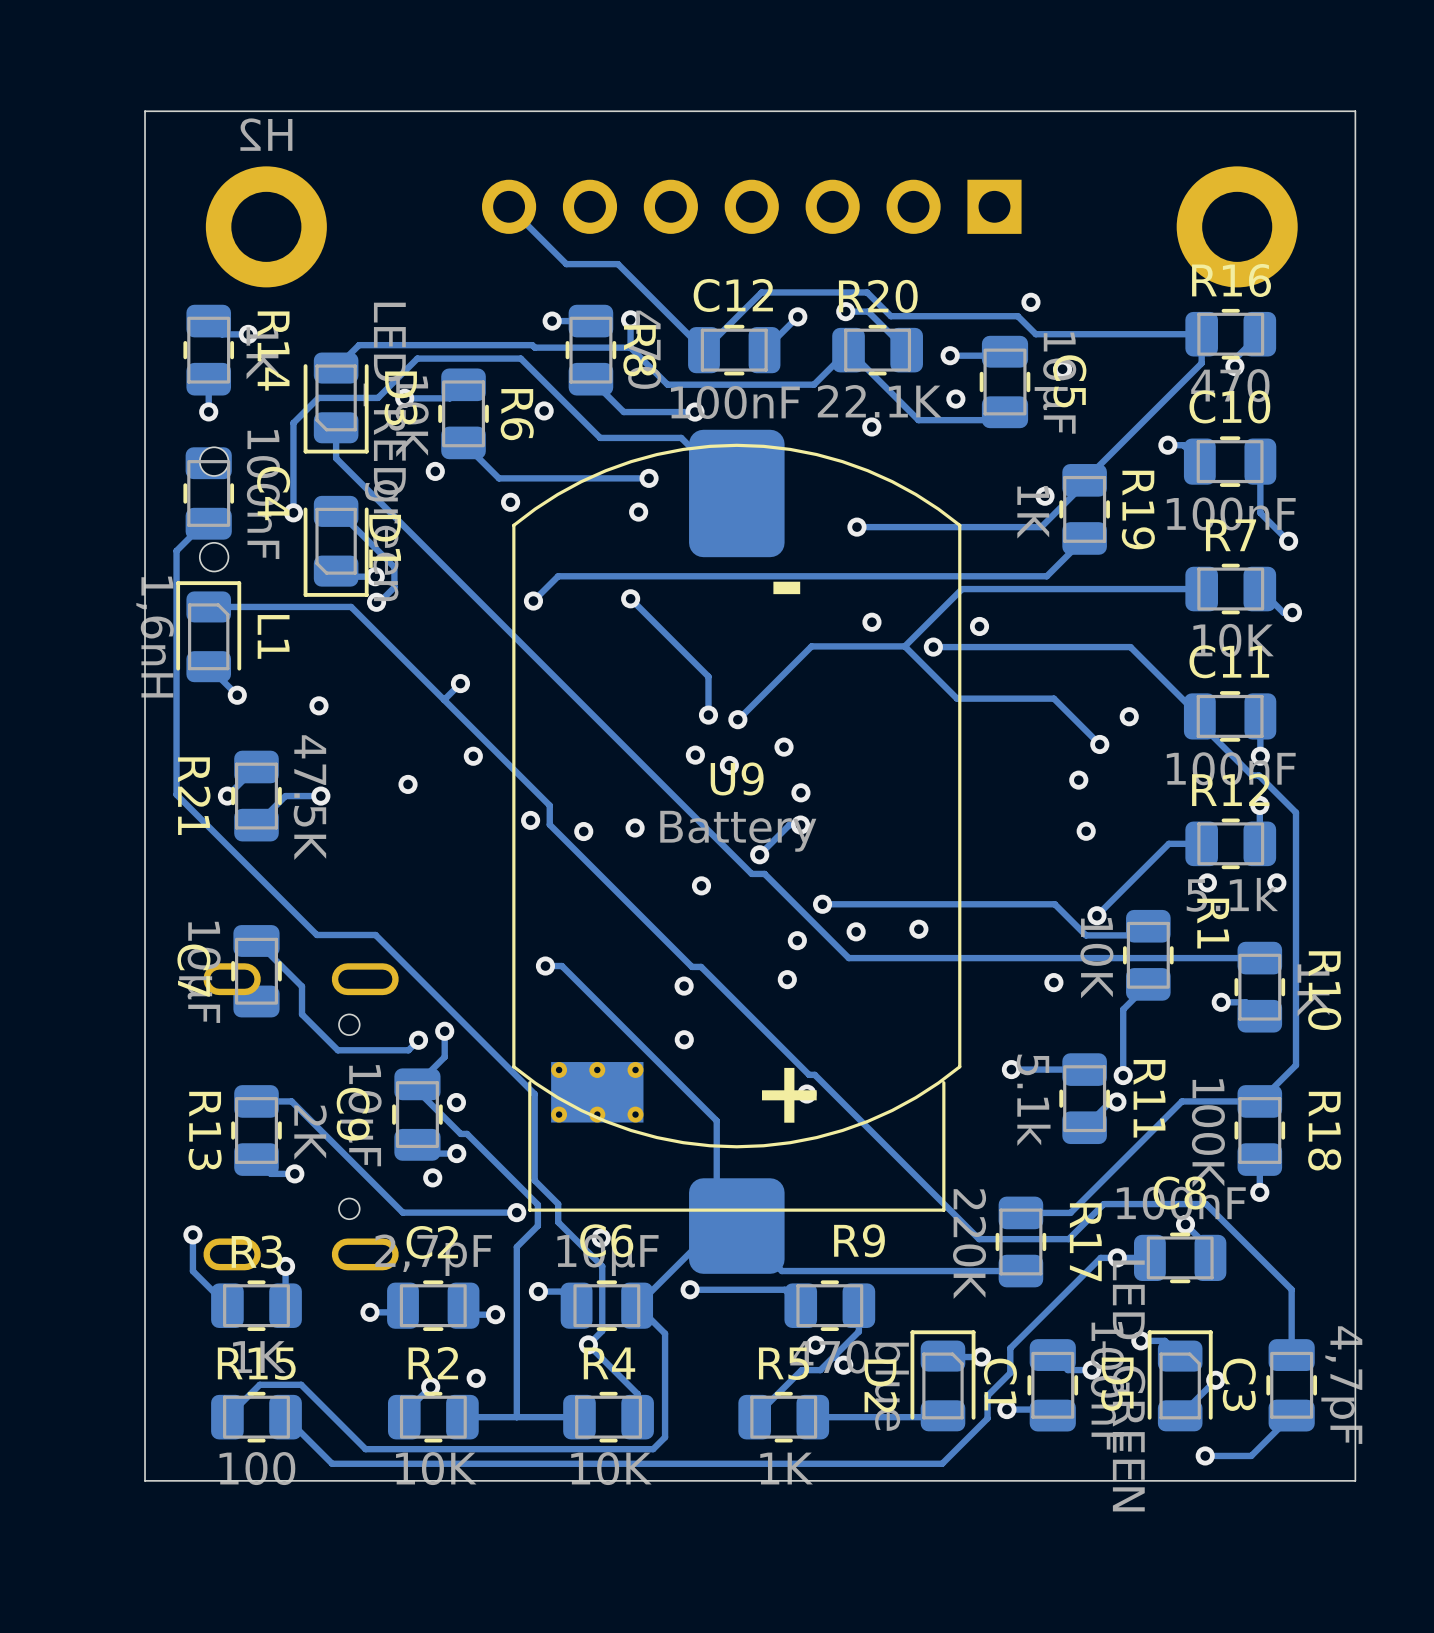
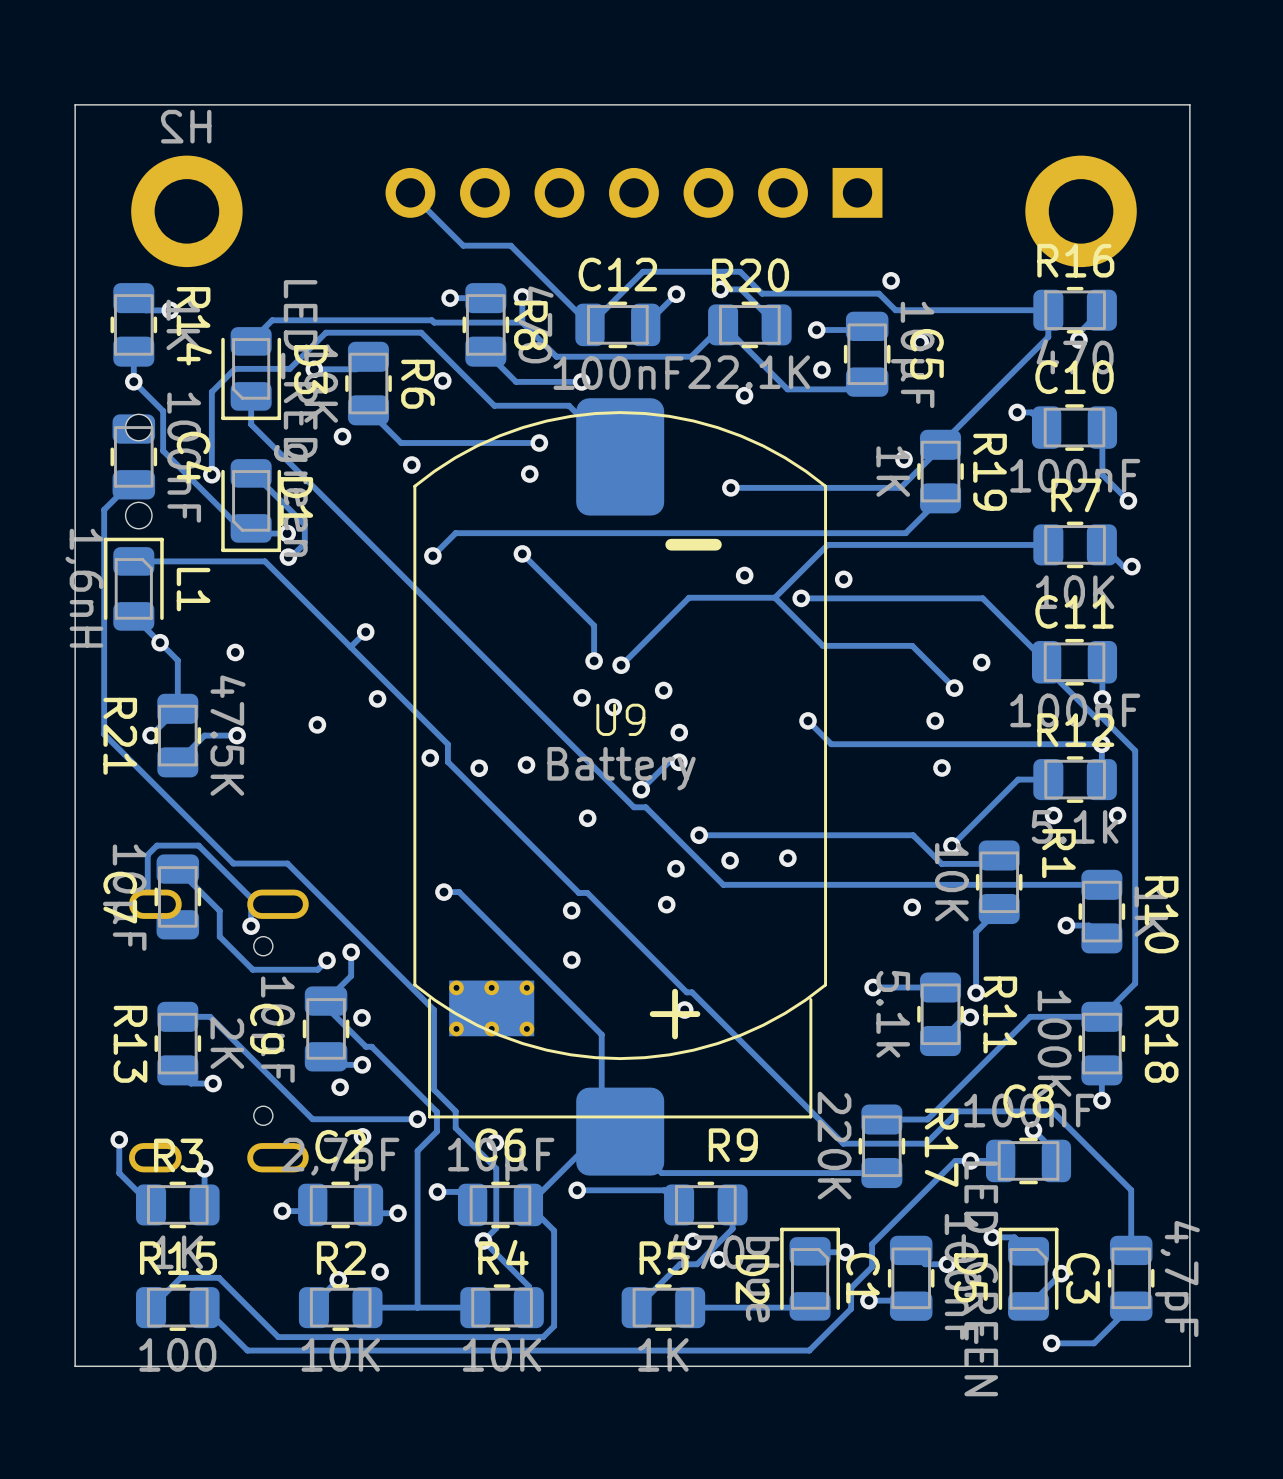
track: none -> (133, 381) (163, 411) (163, 450) (242, 530) (251, 530)
track: none -> (160, 642) (177, 660) (177, 706)
track: none -> (808, 720) (831, 744) (1101, 744)
via: none -> (808, 720)
track: none -> (163, 911) (147, 896) (147, 854) (156, 845) (198, 845) (251, 898) (251, 926)
via: none -> (251, 926)
via: none -> (362, 1136)

